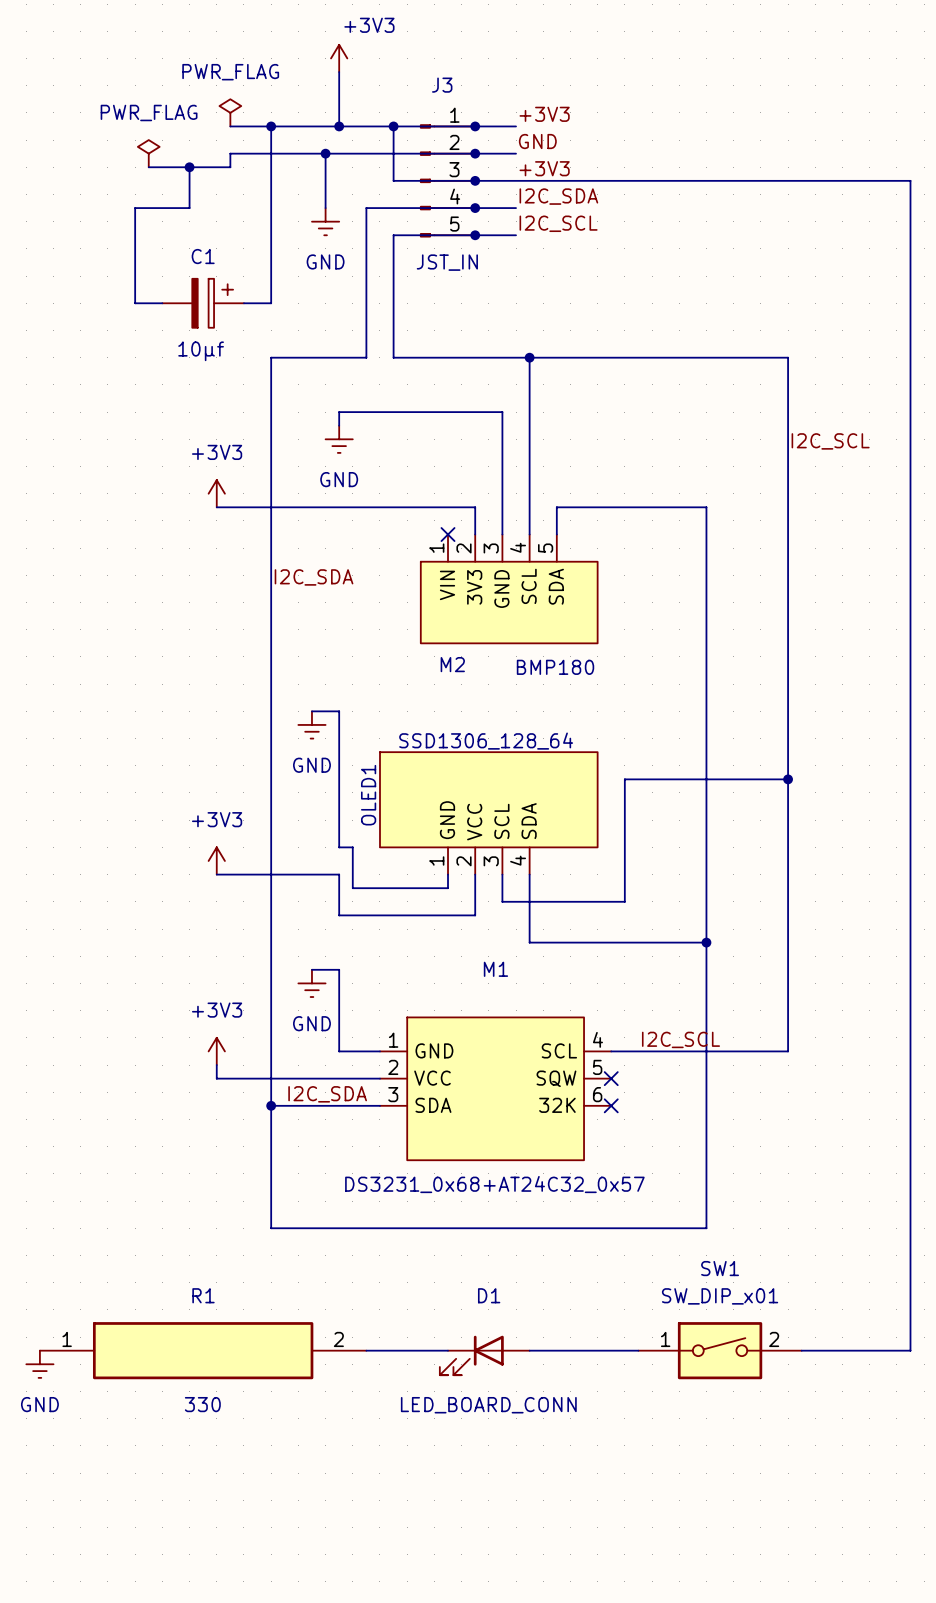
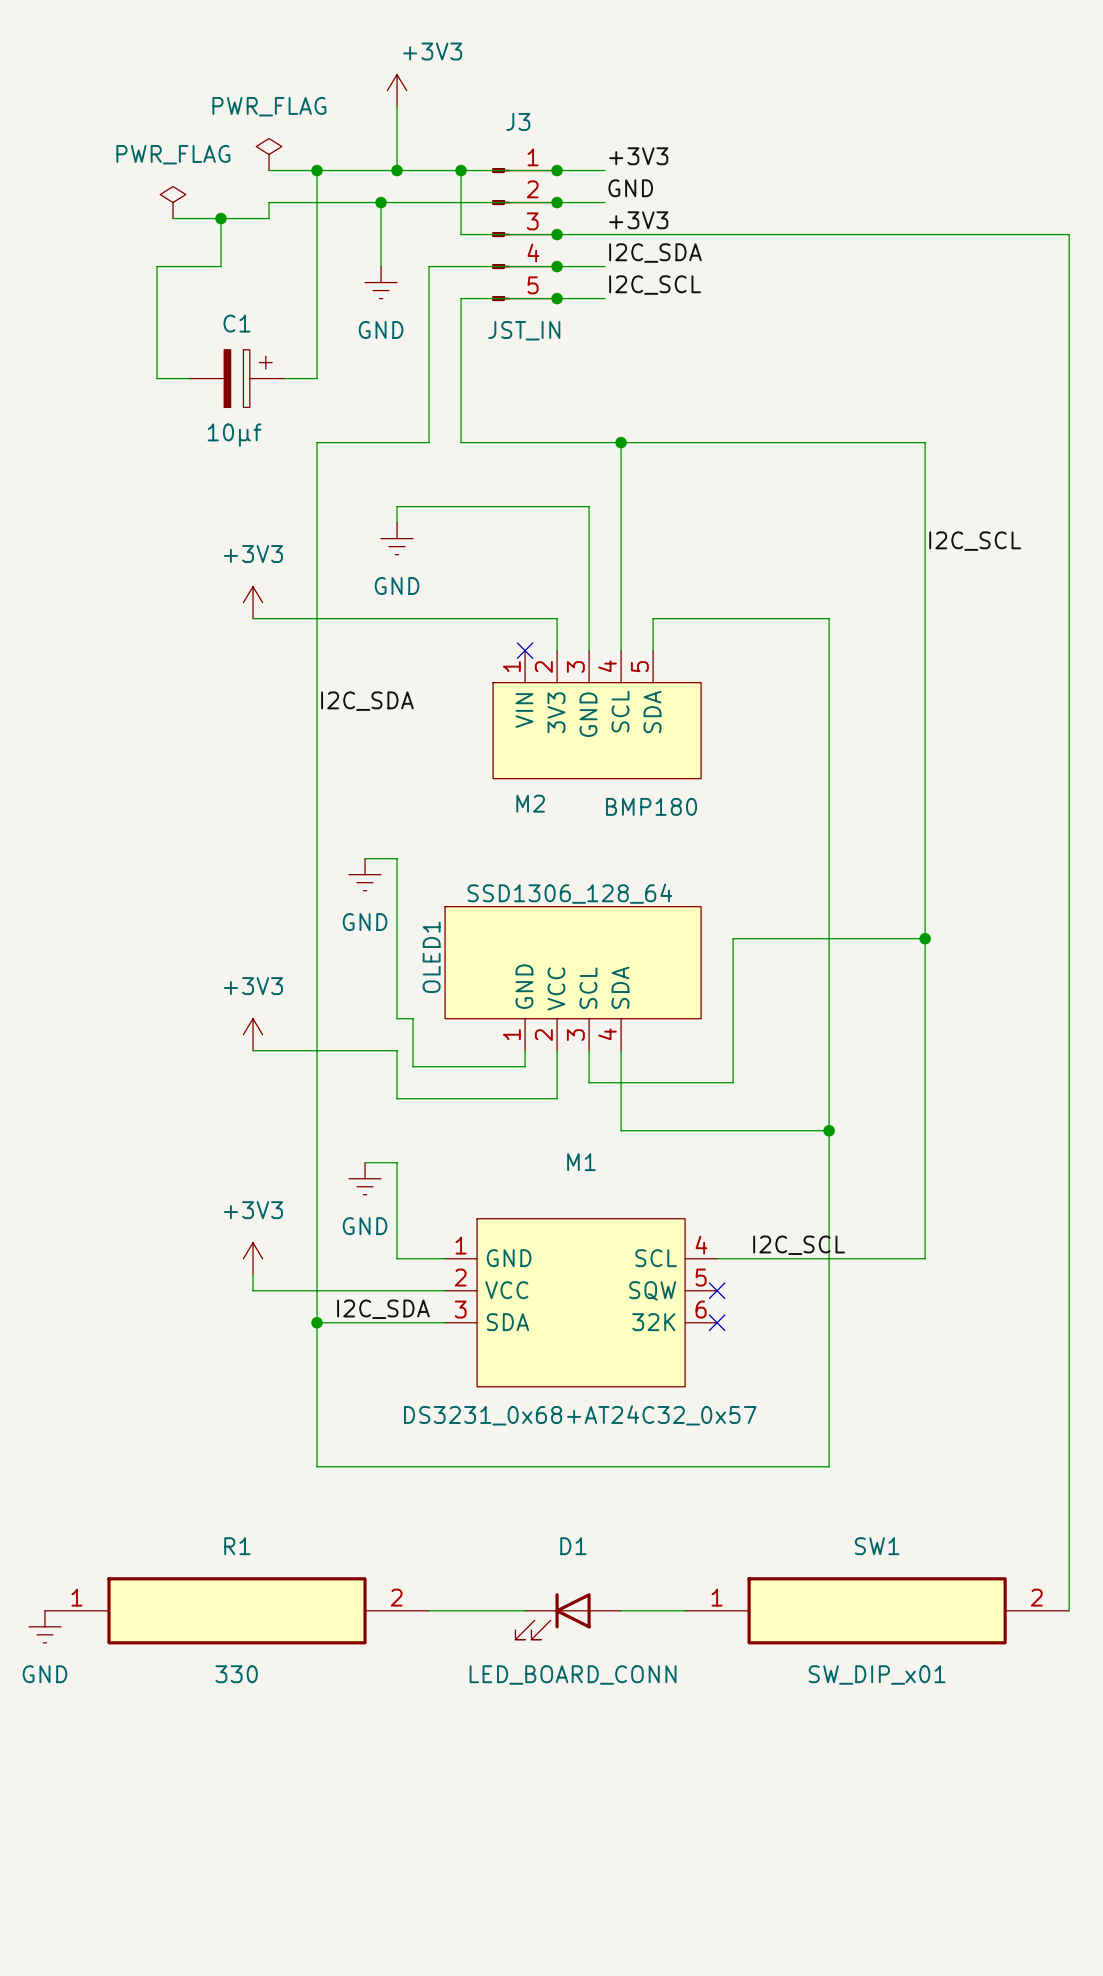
SW1 name position: SW1 (720, 1268) -> SW1 (877, 1546)
SW1 value position: SW_DIP_x01 (720, 1296) -> SW_DIP_x01 (877, 1674)
SW1 symbol: [638, 1322, 802, 1380] -> [685, 1577, 1070, 1645]

